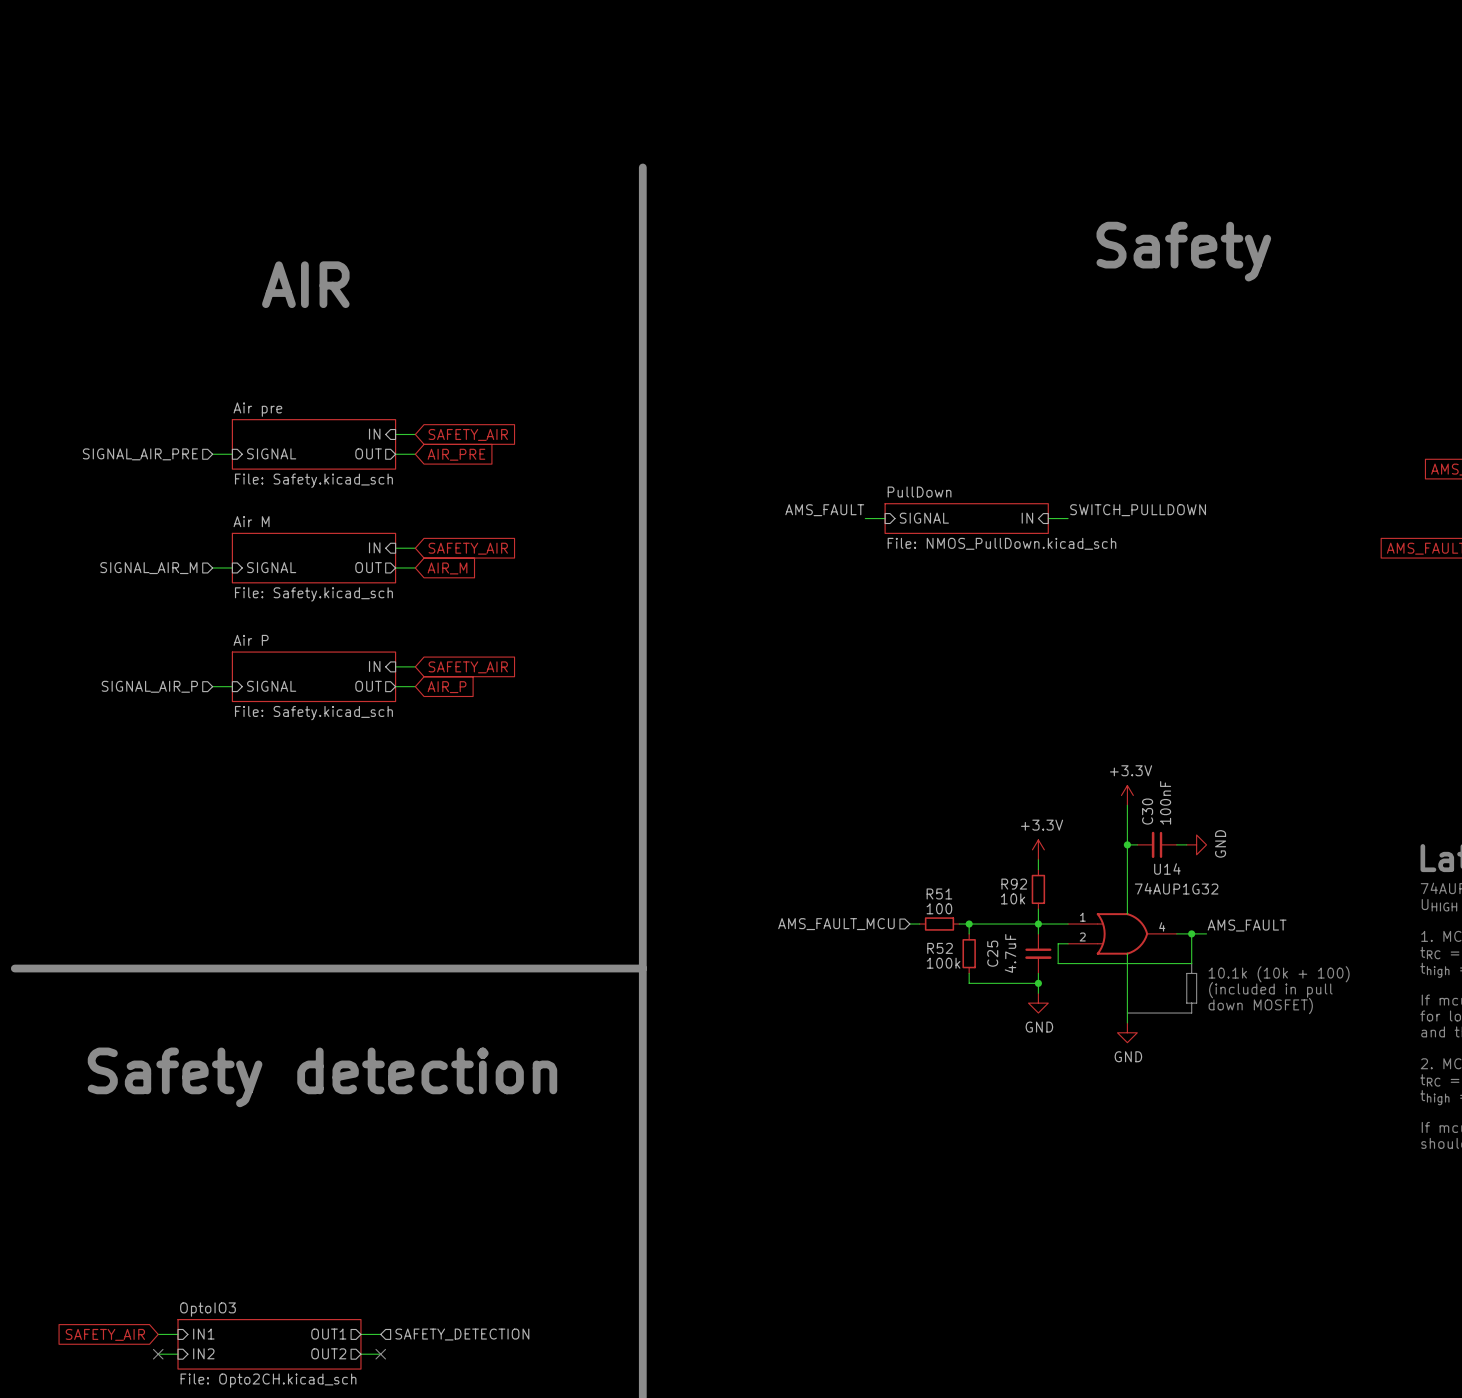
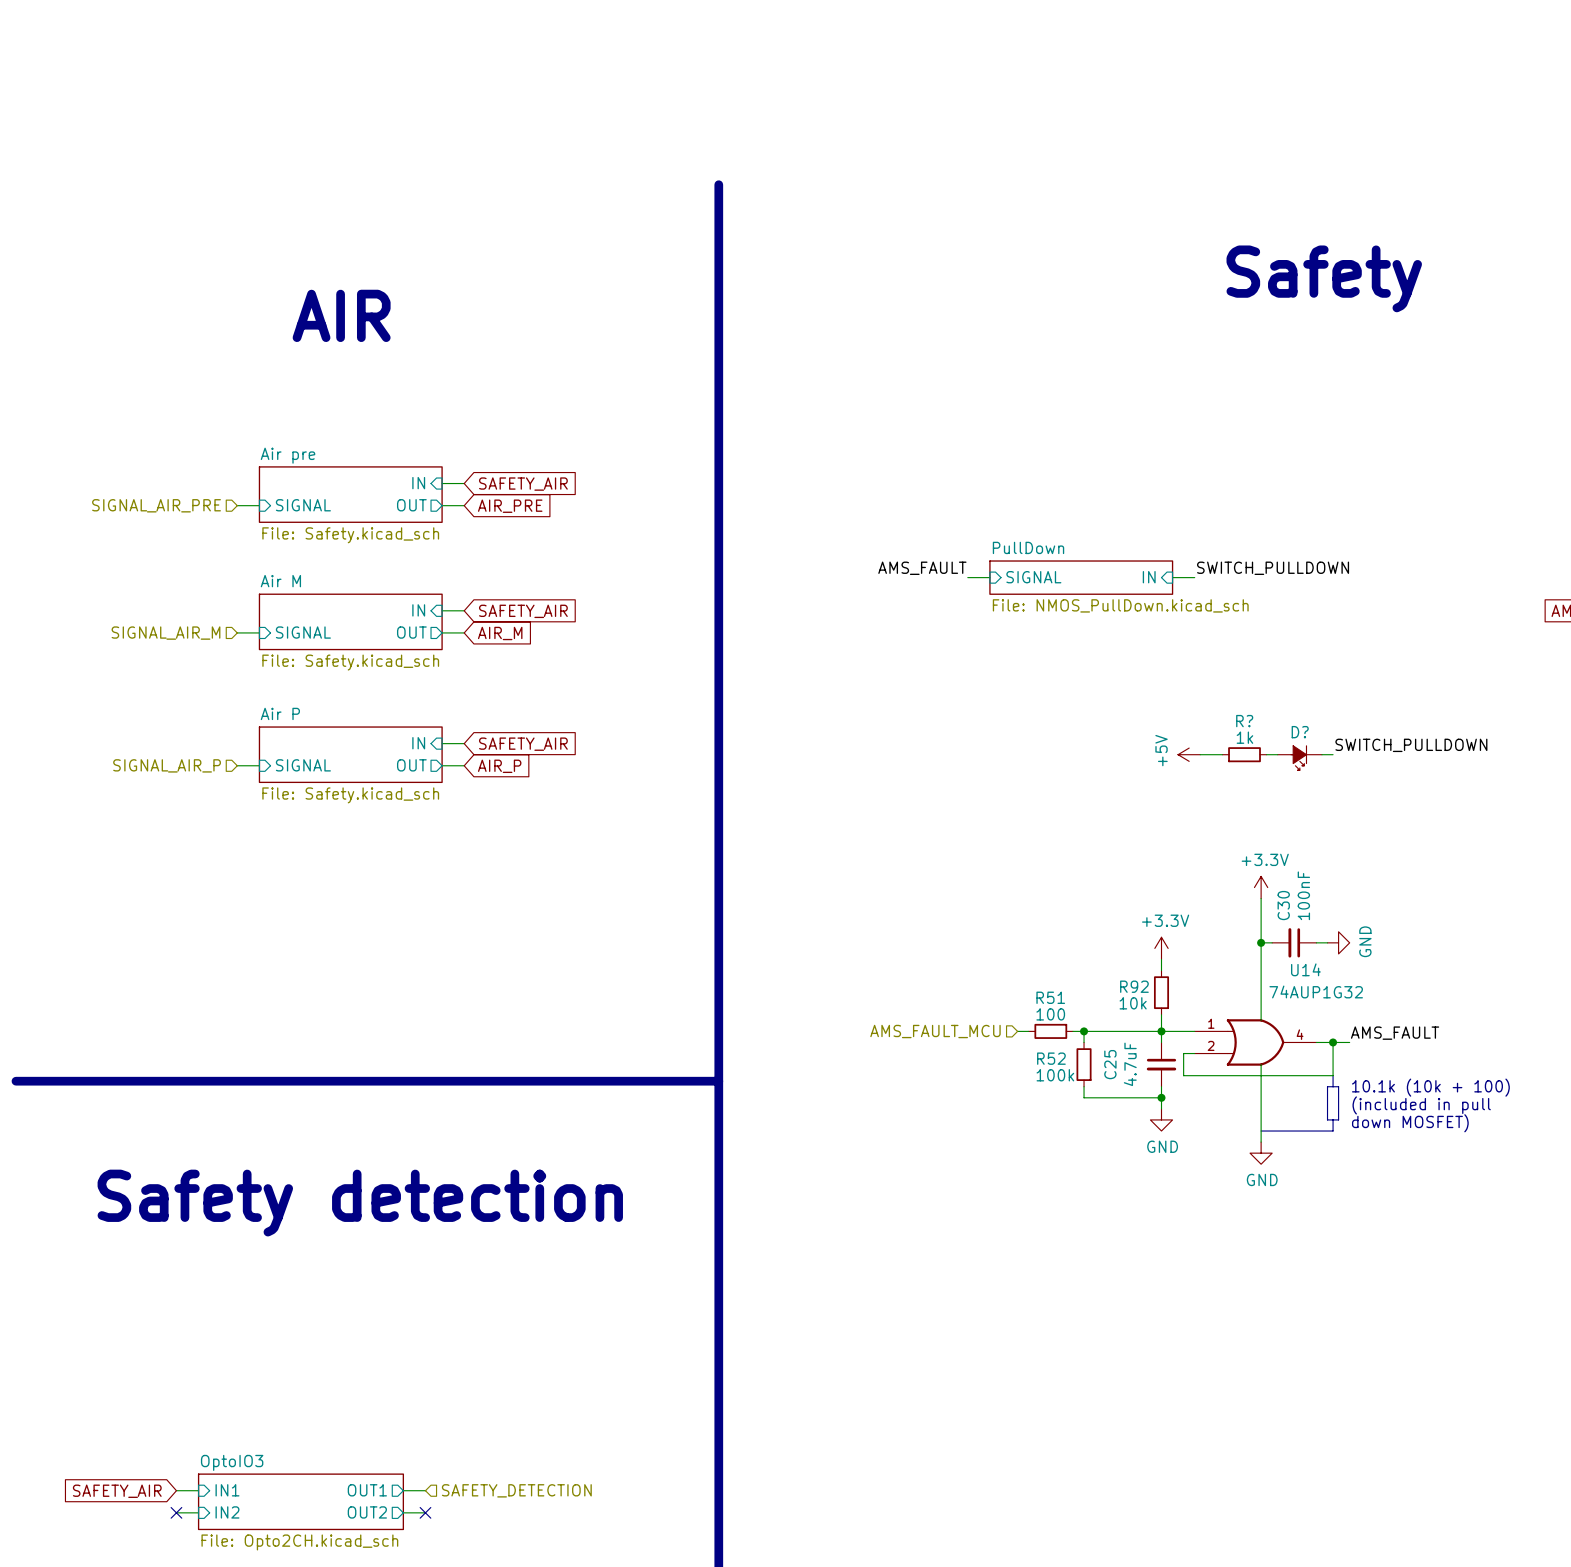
label: none -> SWITCH_PULLDOWN (1411, 745)
power symbol: none -> +5V (1189, 754)
wire: none -> (1200, 754) (1222, 754)
R?: none -> 1k (1244, 754)
wire: none -> (1266, 754) (1277, 754)
wire: none -> (1321, 754) (1333, 754)
D?: none -> (1299, 758)

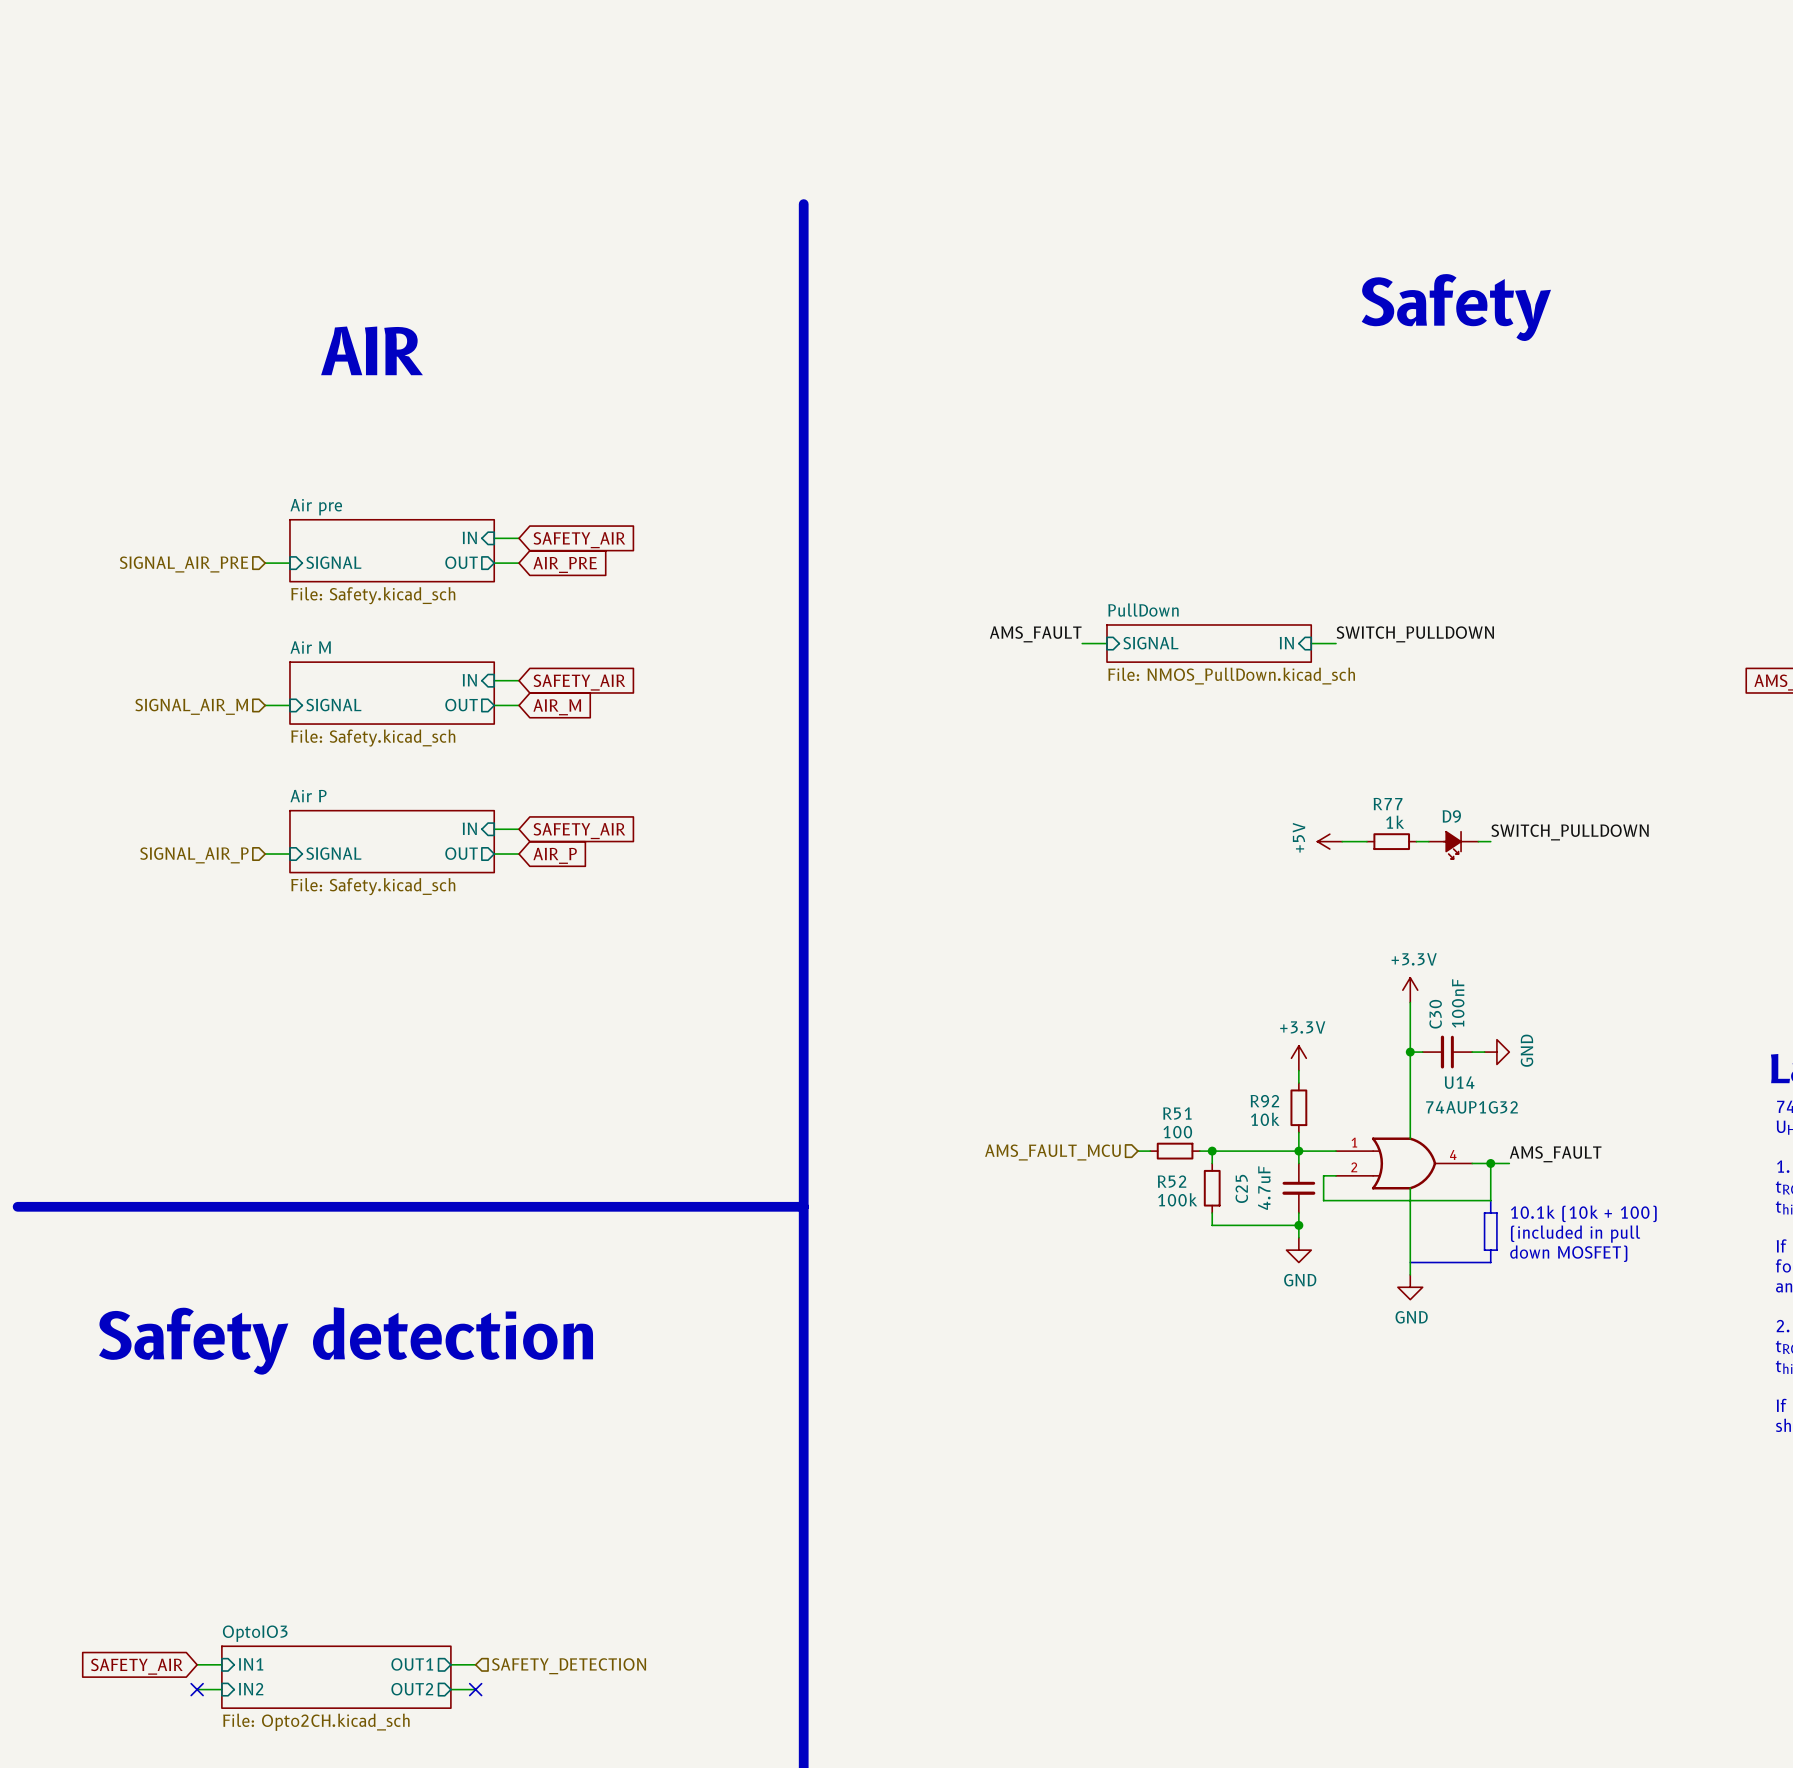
R? name: R? (1244, 721) -> R77 (1388, 804)
D? name: D? (1300, 732) -> D9 (1451, 816)

